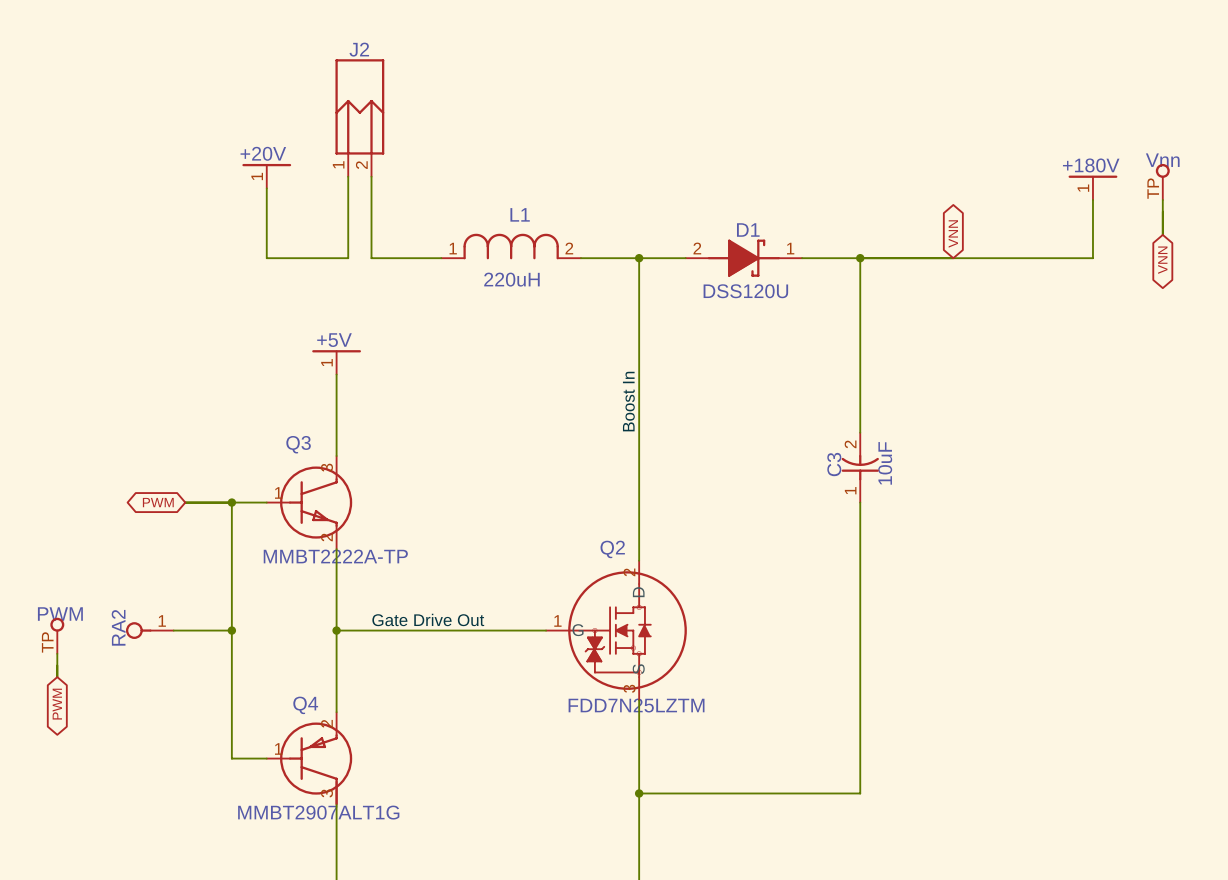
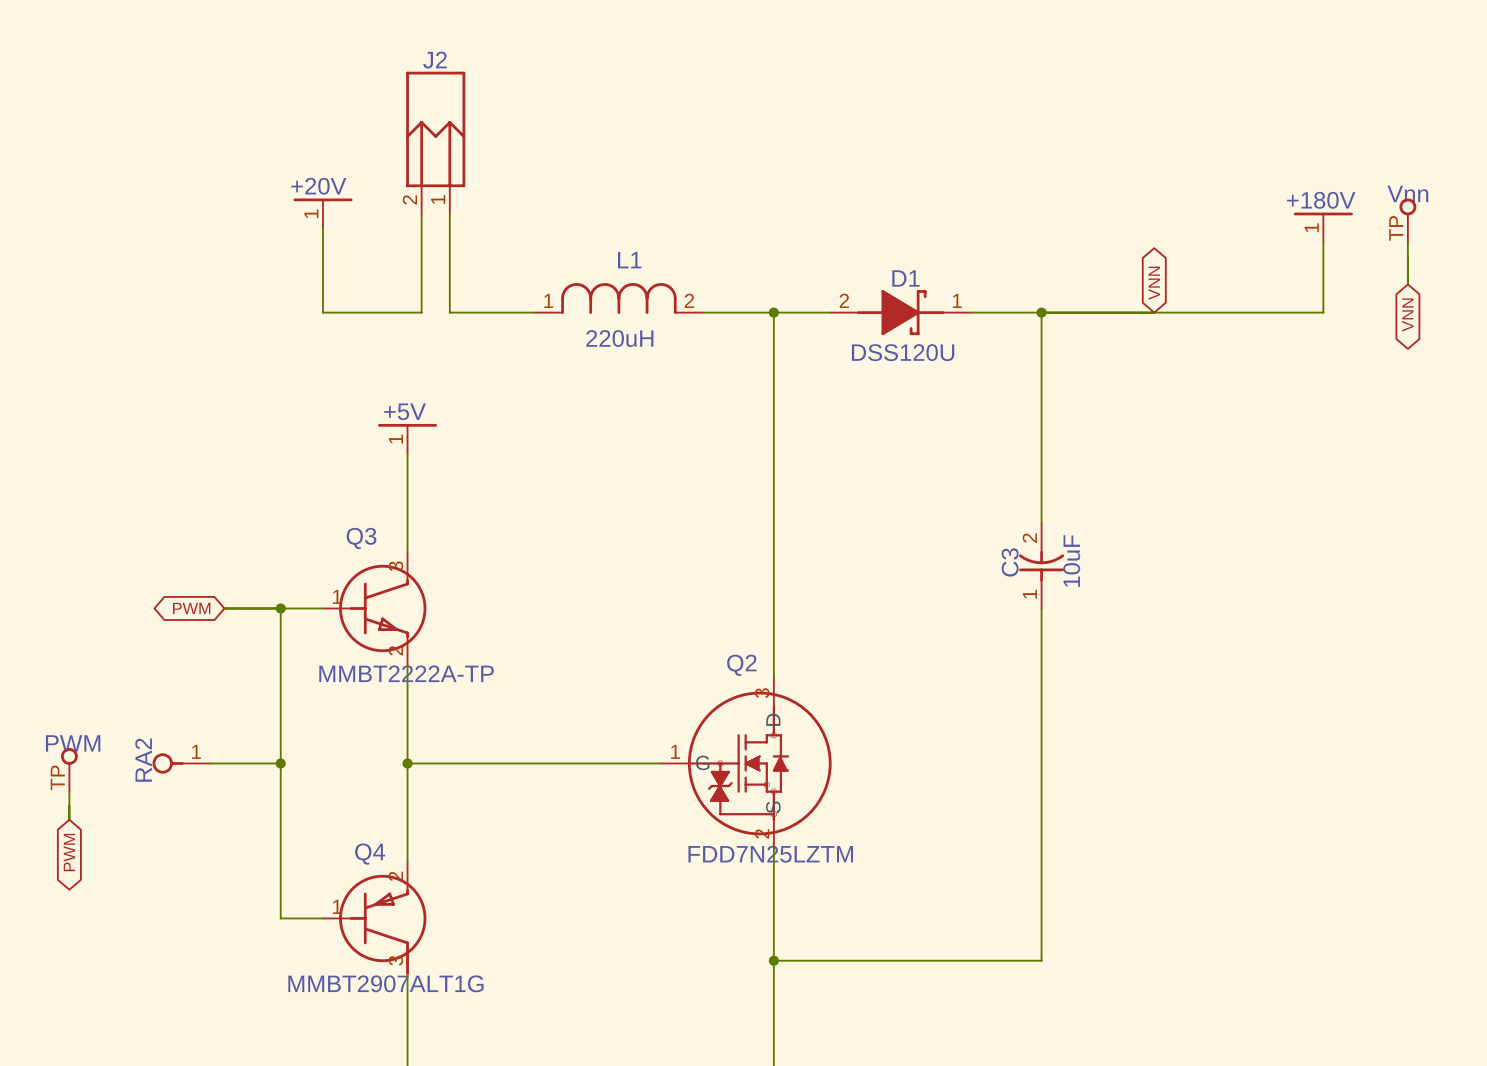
part flip: as is (359, 106) -> left-right (435, 129)
label: Boost In (628, 401) -> none
part symbol: [546, 560, 687, 701] -> [661, 678, 832, 849]
label: Gate Drive Out (428, 619) -> none

